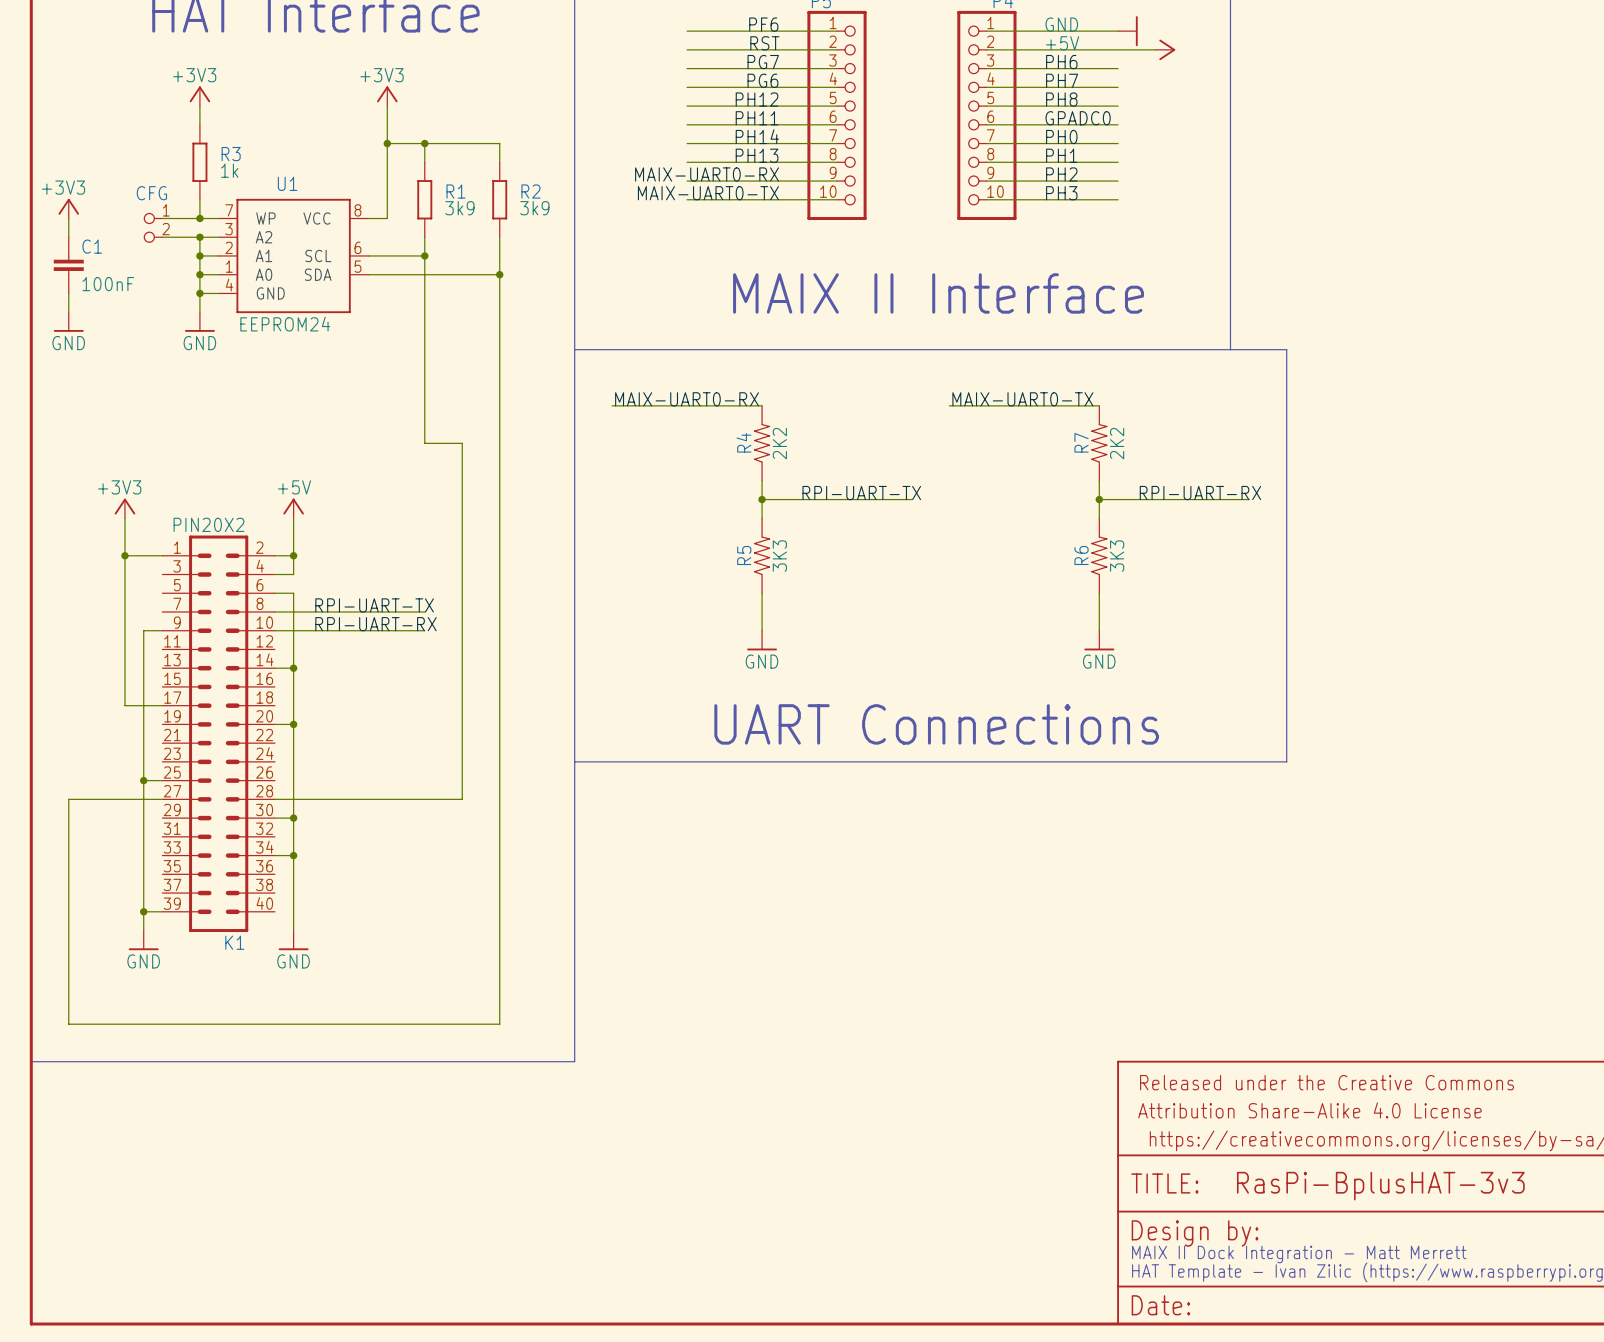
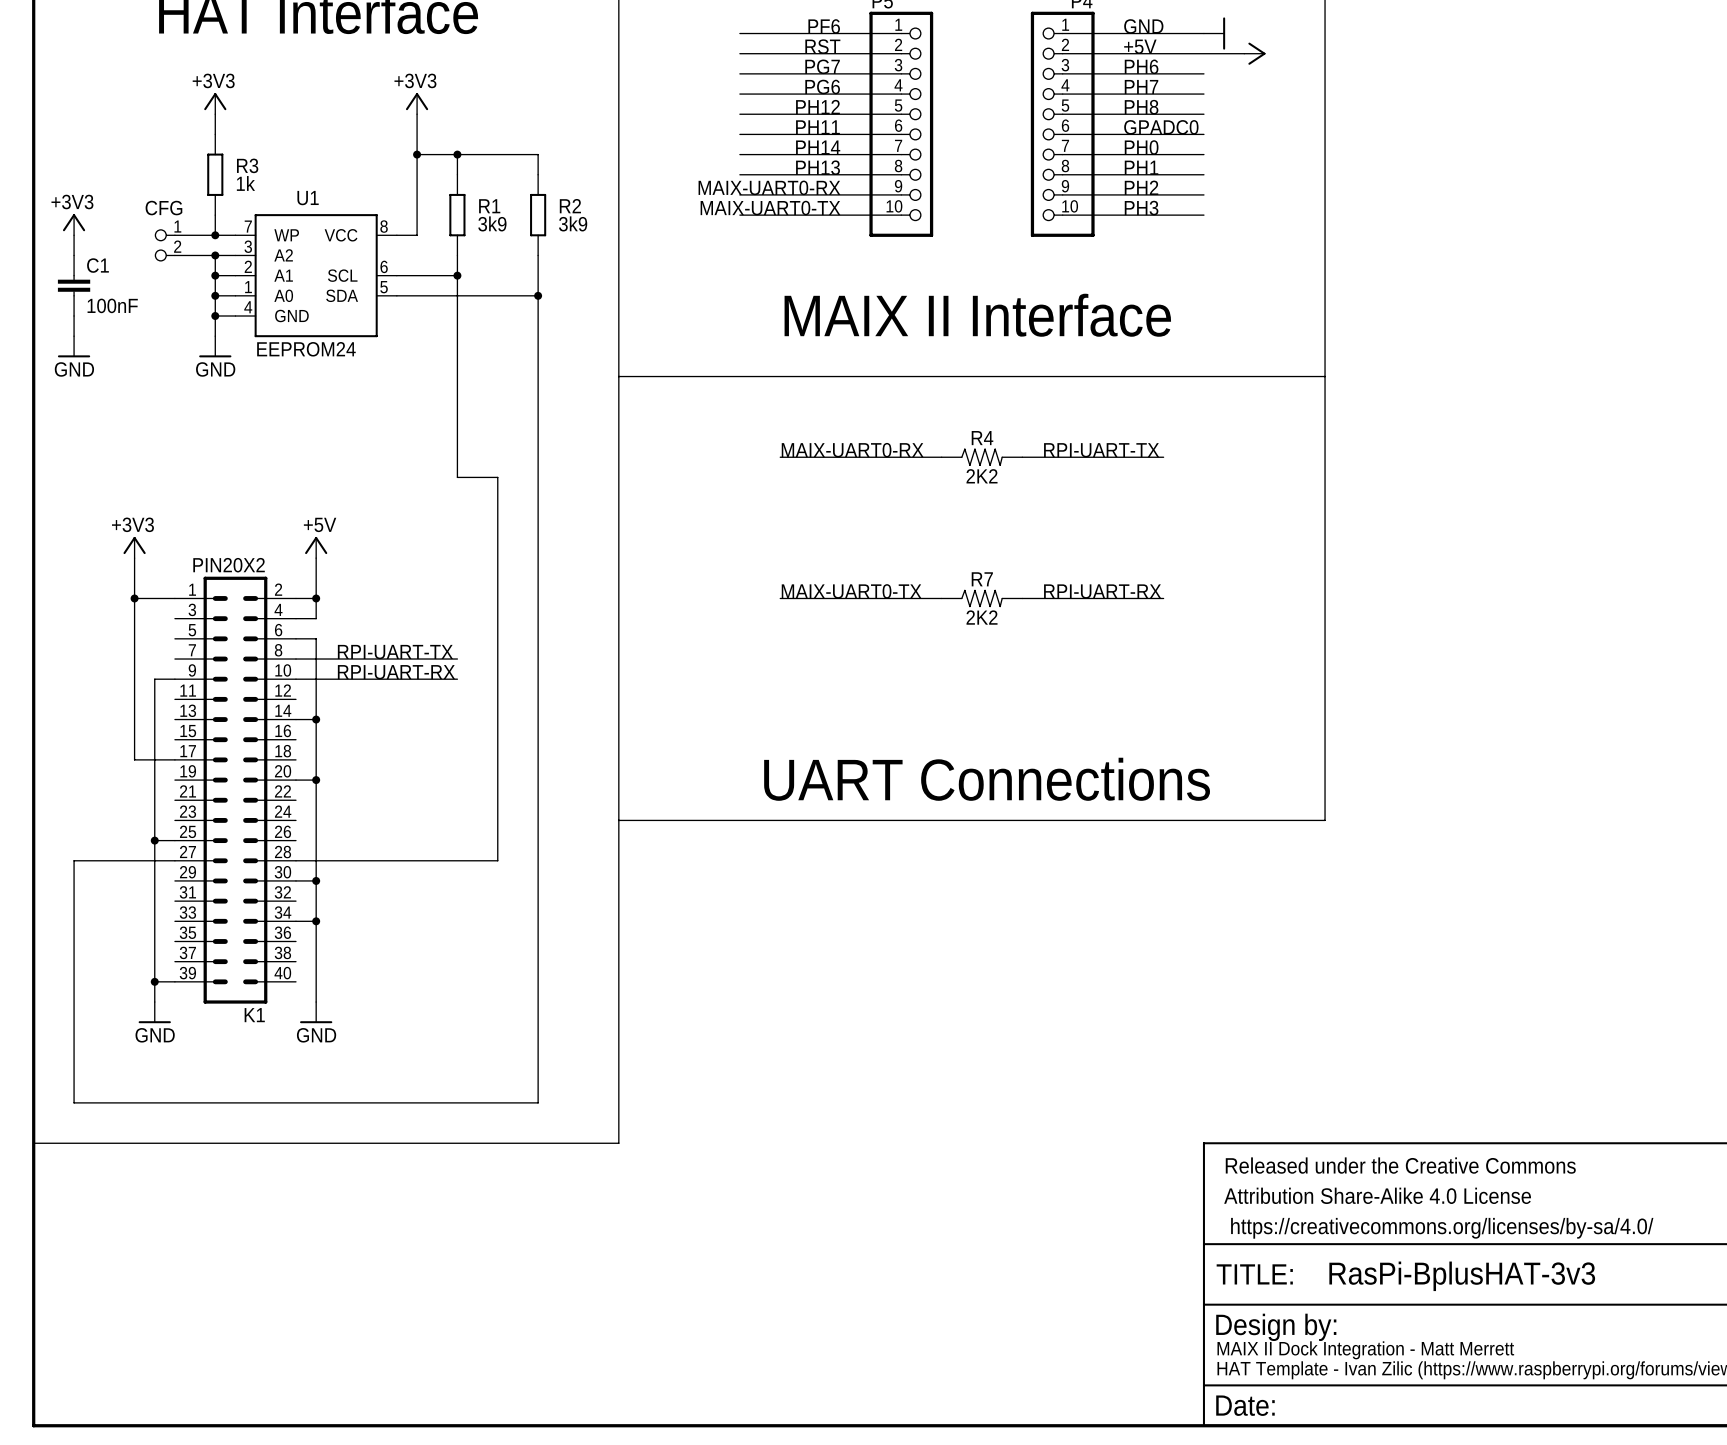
line: (1230, 349) (1286, 349) (1286, 761) (1230, 761) -> (1325, 376) (1325, 820)
label position: MAIX-UART0-RX (687, 399) -> MAIX-UART0-RX (852, 450)
label: MAIX-UART0-TX (1022, 399) -> RPI-UART-TX (1101, 450)
wire: (612, 405) (762, 405) -> (780, 457) (941, 457)
wire: (949, 405) (1099, 405) -> none
wire: none -> (1022, 457) (1163, 457)
R4 rotation: 0° (762, 443) -> 90° clockwise (982, 457)
R4 position: (762, 443) -> (982, 457)
R7 rotation: 0° (1099, 443) -> 90° clockwise (982, 598)
R7 position: (1099, 443) -> (982, 598)
wire: (762, 480) (762, 518) -> none
wire: (1099, 480) (1099, 518) -> none
label: RPI-UART-TX (861, 493) -> none
label position: RPI-UART-RX (1200, 493) -> RPI-UART-RX (1102, 591)
wire: (762, 499) (911, 499) -> (780, 598) (941, 598)
junction: (762, 499) -> none
wire: (1099, 499) (1249, 499) -> none
junction: (1099, 499) -> none
label: none -> MAIX-UART0-TX (851, 591)
R5: 3K3 (762, 555) -> none
wire: none -> (1022, 598) (1163, 598)
R6: 3K3 (1099, 555) -> none
wire: (762, 593) (762, 630) -> none
wire: (1099, 593) (1099, 630) -> none
power symbol: GND (762, 640) -> none
power symbol: GND (1099, 640) -> none

